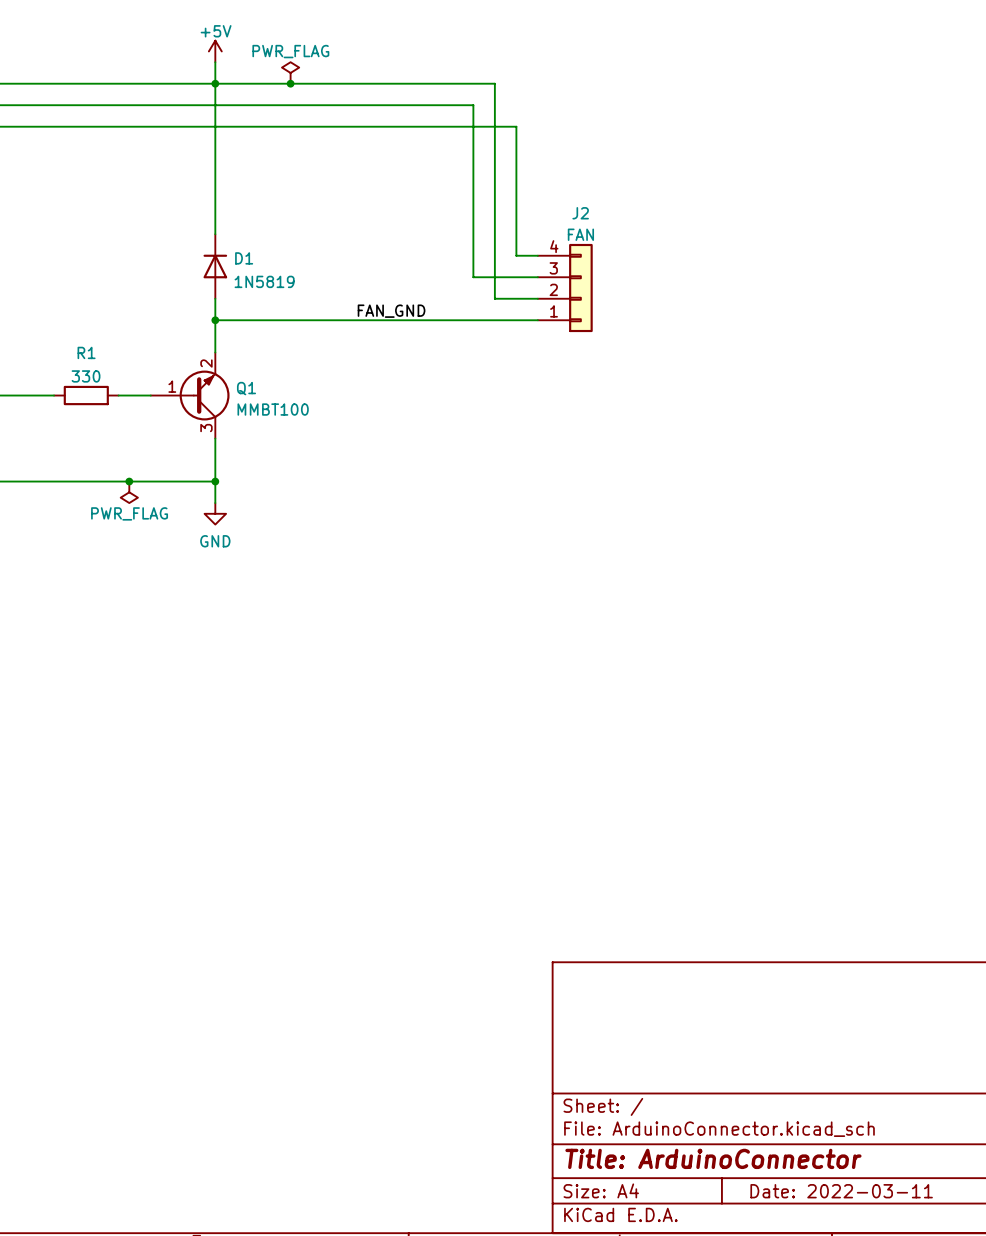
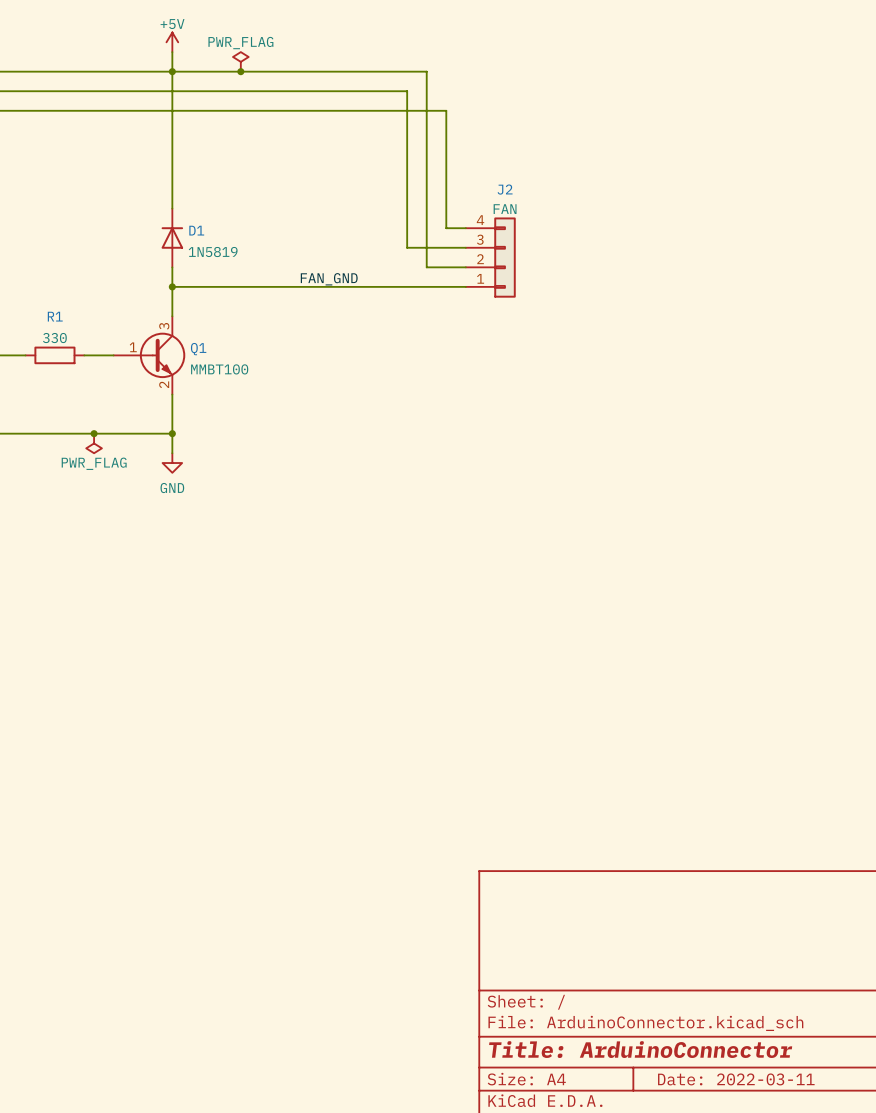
Q1 flip: as is (204, 395) -> up-down (162, 355)

